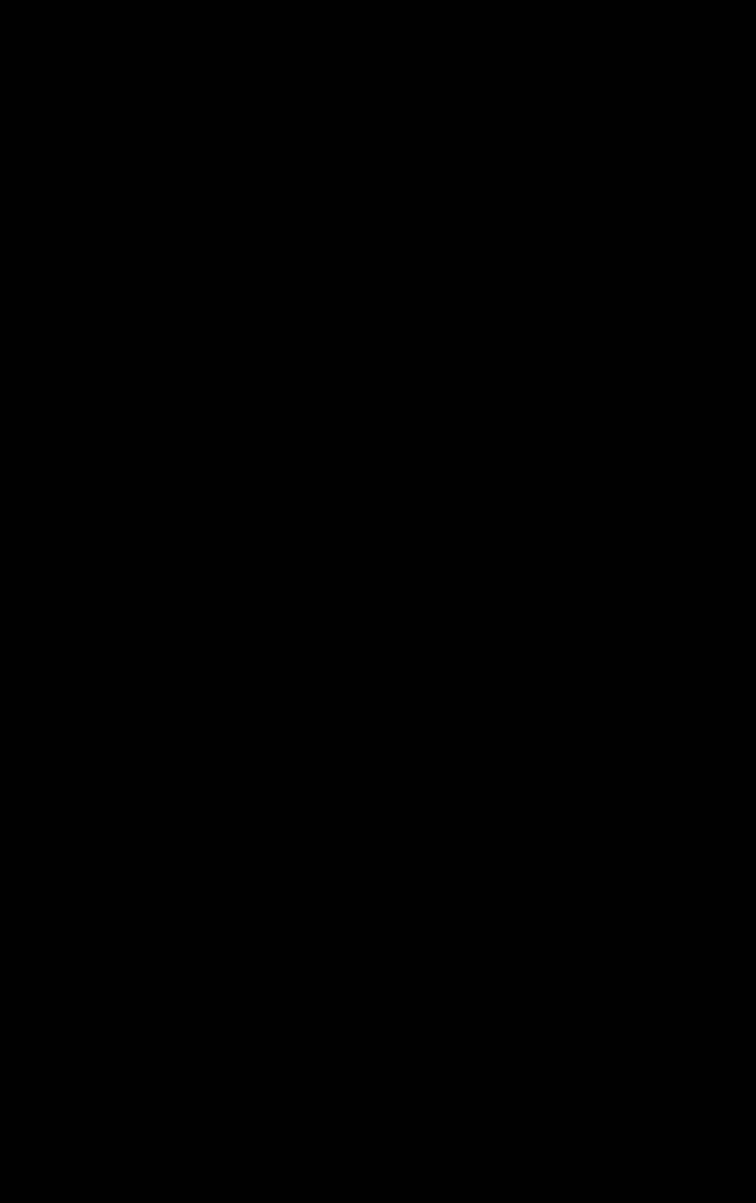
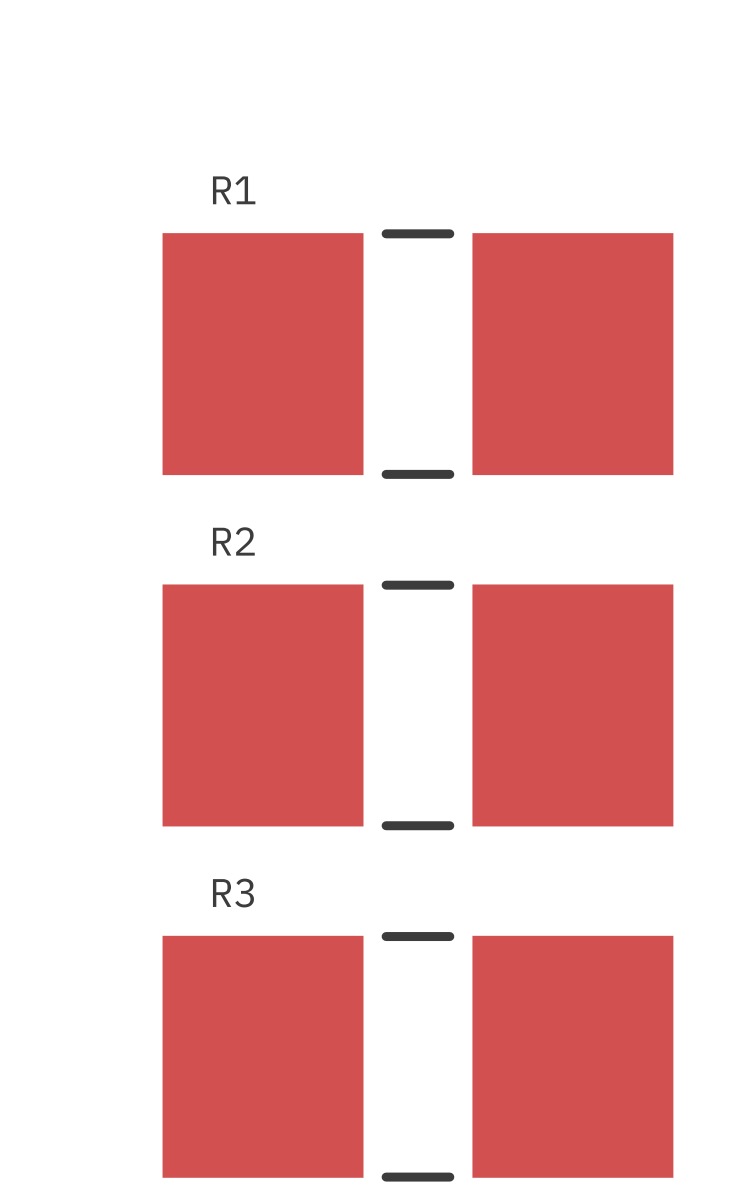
R1: none -> (417, 354)
R2: none -> (417, 705)
R3: none -> (417, 1056)

